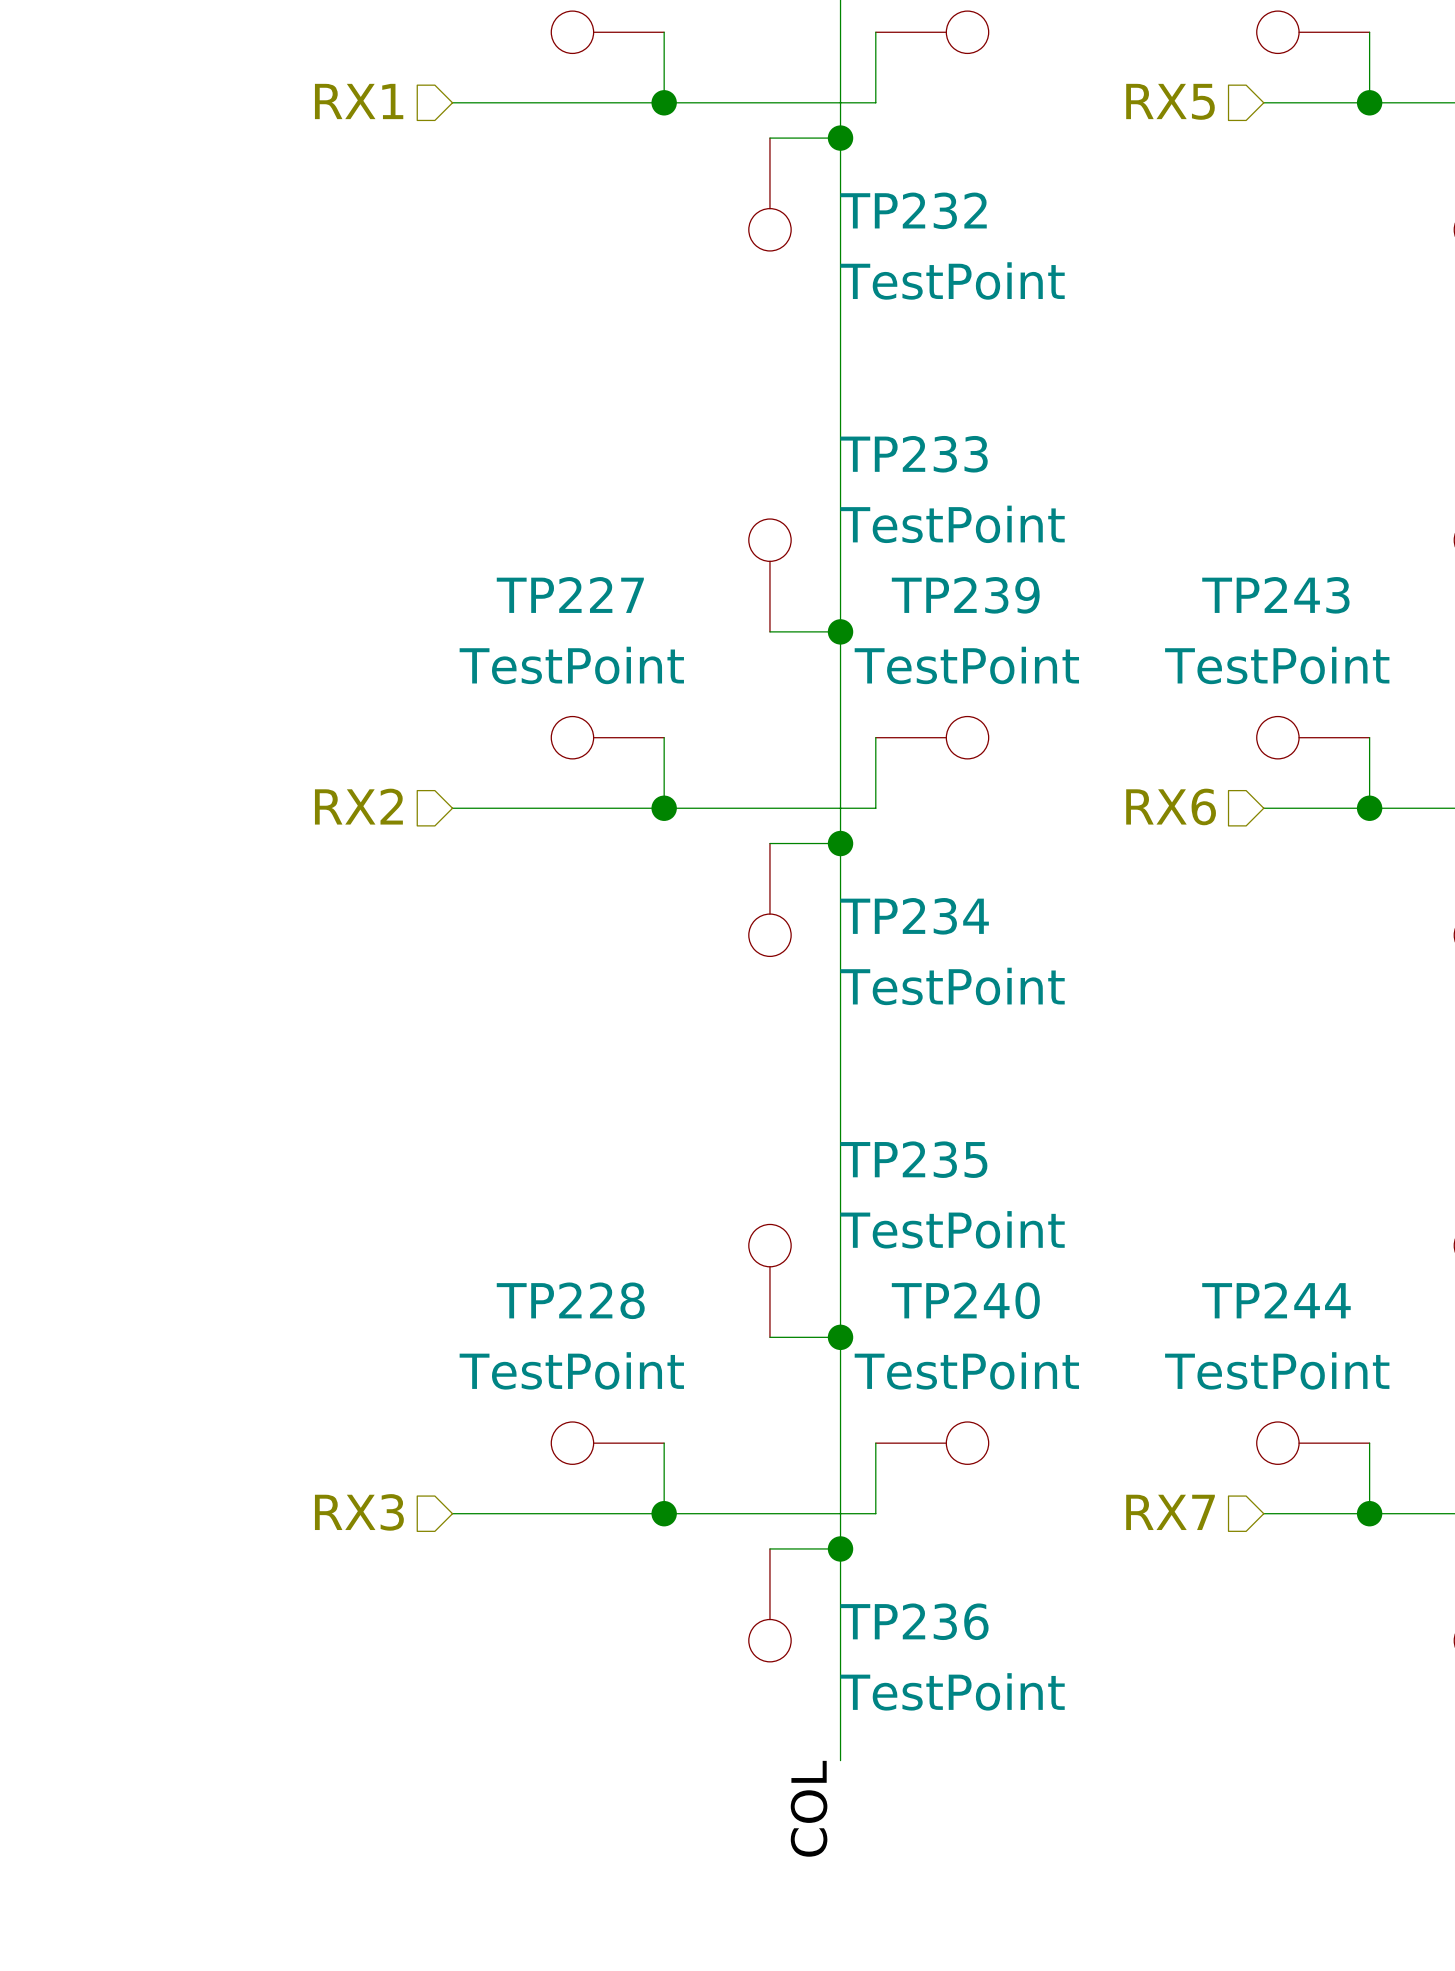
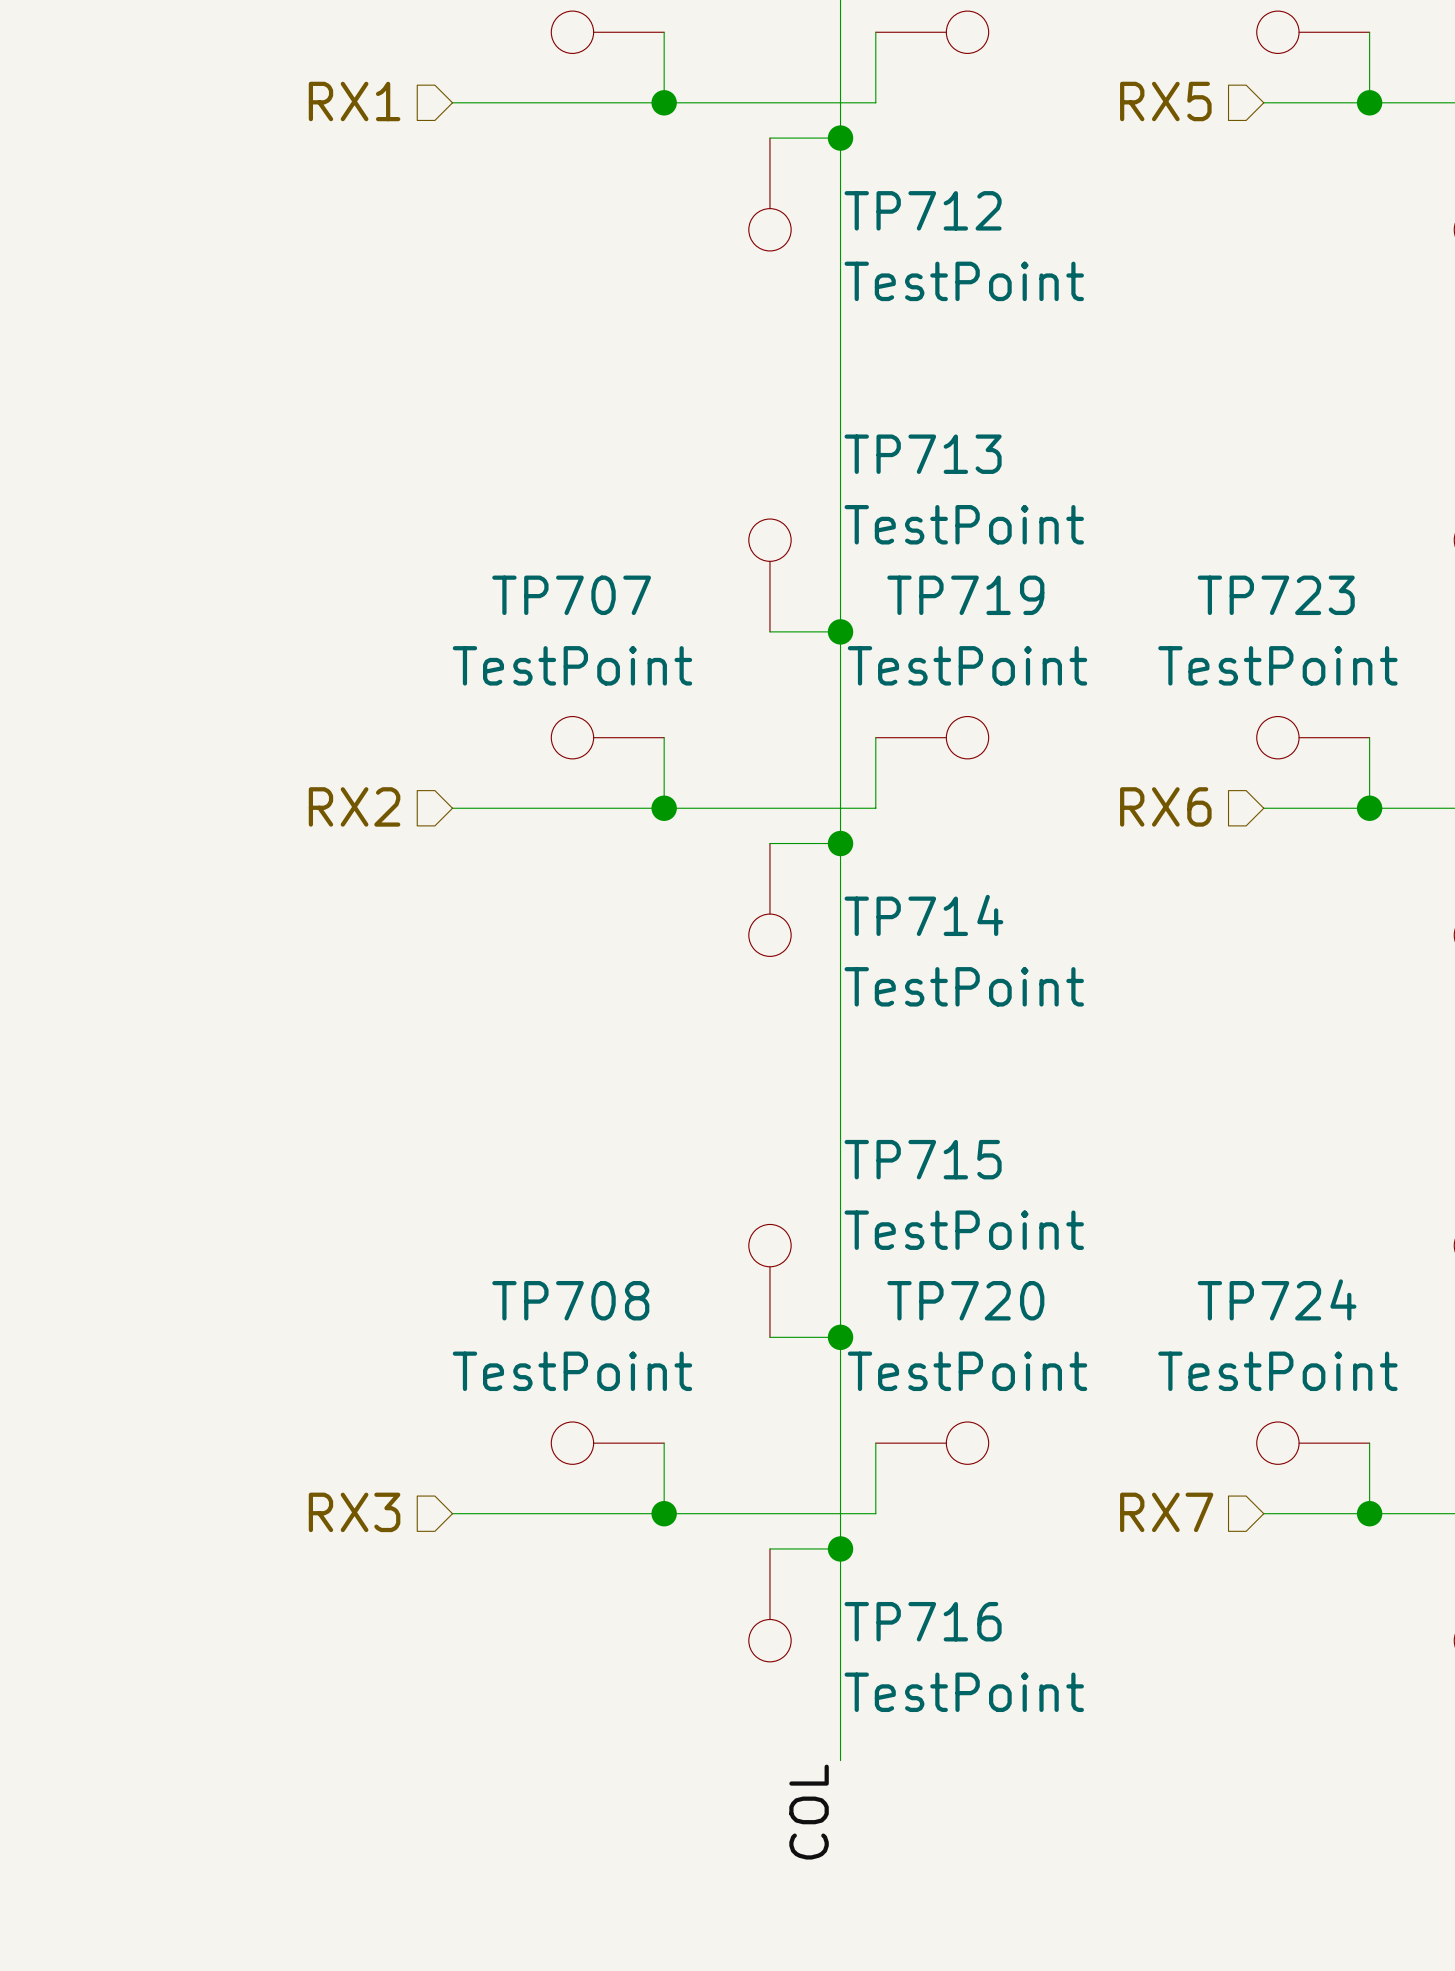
TP232 name: TP232 (913, 210) -> TP712 (923, 210)
TP233 name: TP233 (914, 454) -> TP713 (923, 454)
TP227 name: TP227 (570, 594) -> TP707 (571, 595)
TP239 name: TP239 (965, 595) -> TP719 (965, 595)
TP243 name: TP243 (1275, 595) -> TP723 (1276, 595)
TP234 name: TP234 (914, 916) -> TP714 (923, 915)
TP235 name: TP235 (913, 1159) -> TP715 (923, 1159)
TP228 name: TP228 (570, 1300) -> TP708 (570, 1300)
TP240 name: TP240 (965, 1300) -> TP720 (965, 1300)
TP244 name: TP244 (1276, 1300) -> TP724 (1277, 1299)
TP236 name: TP236 (914, 1621) -> TP716 (923, 1621)

